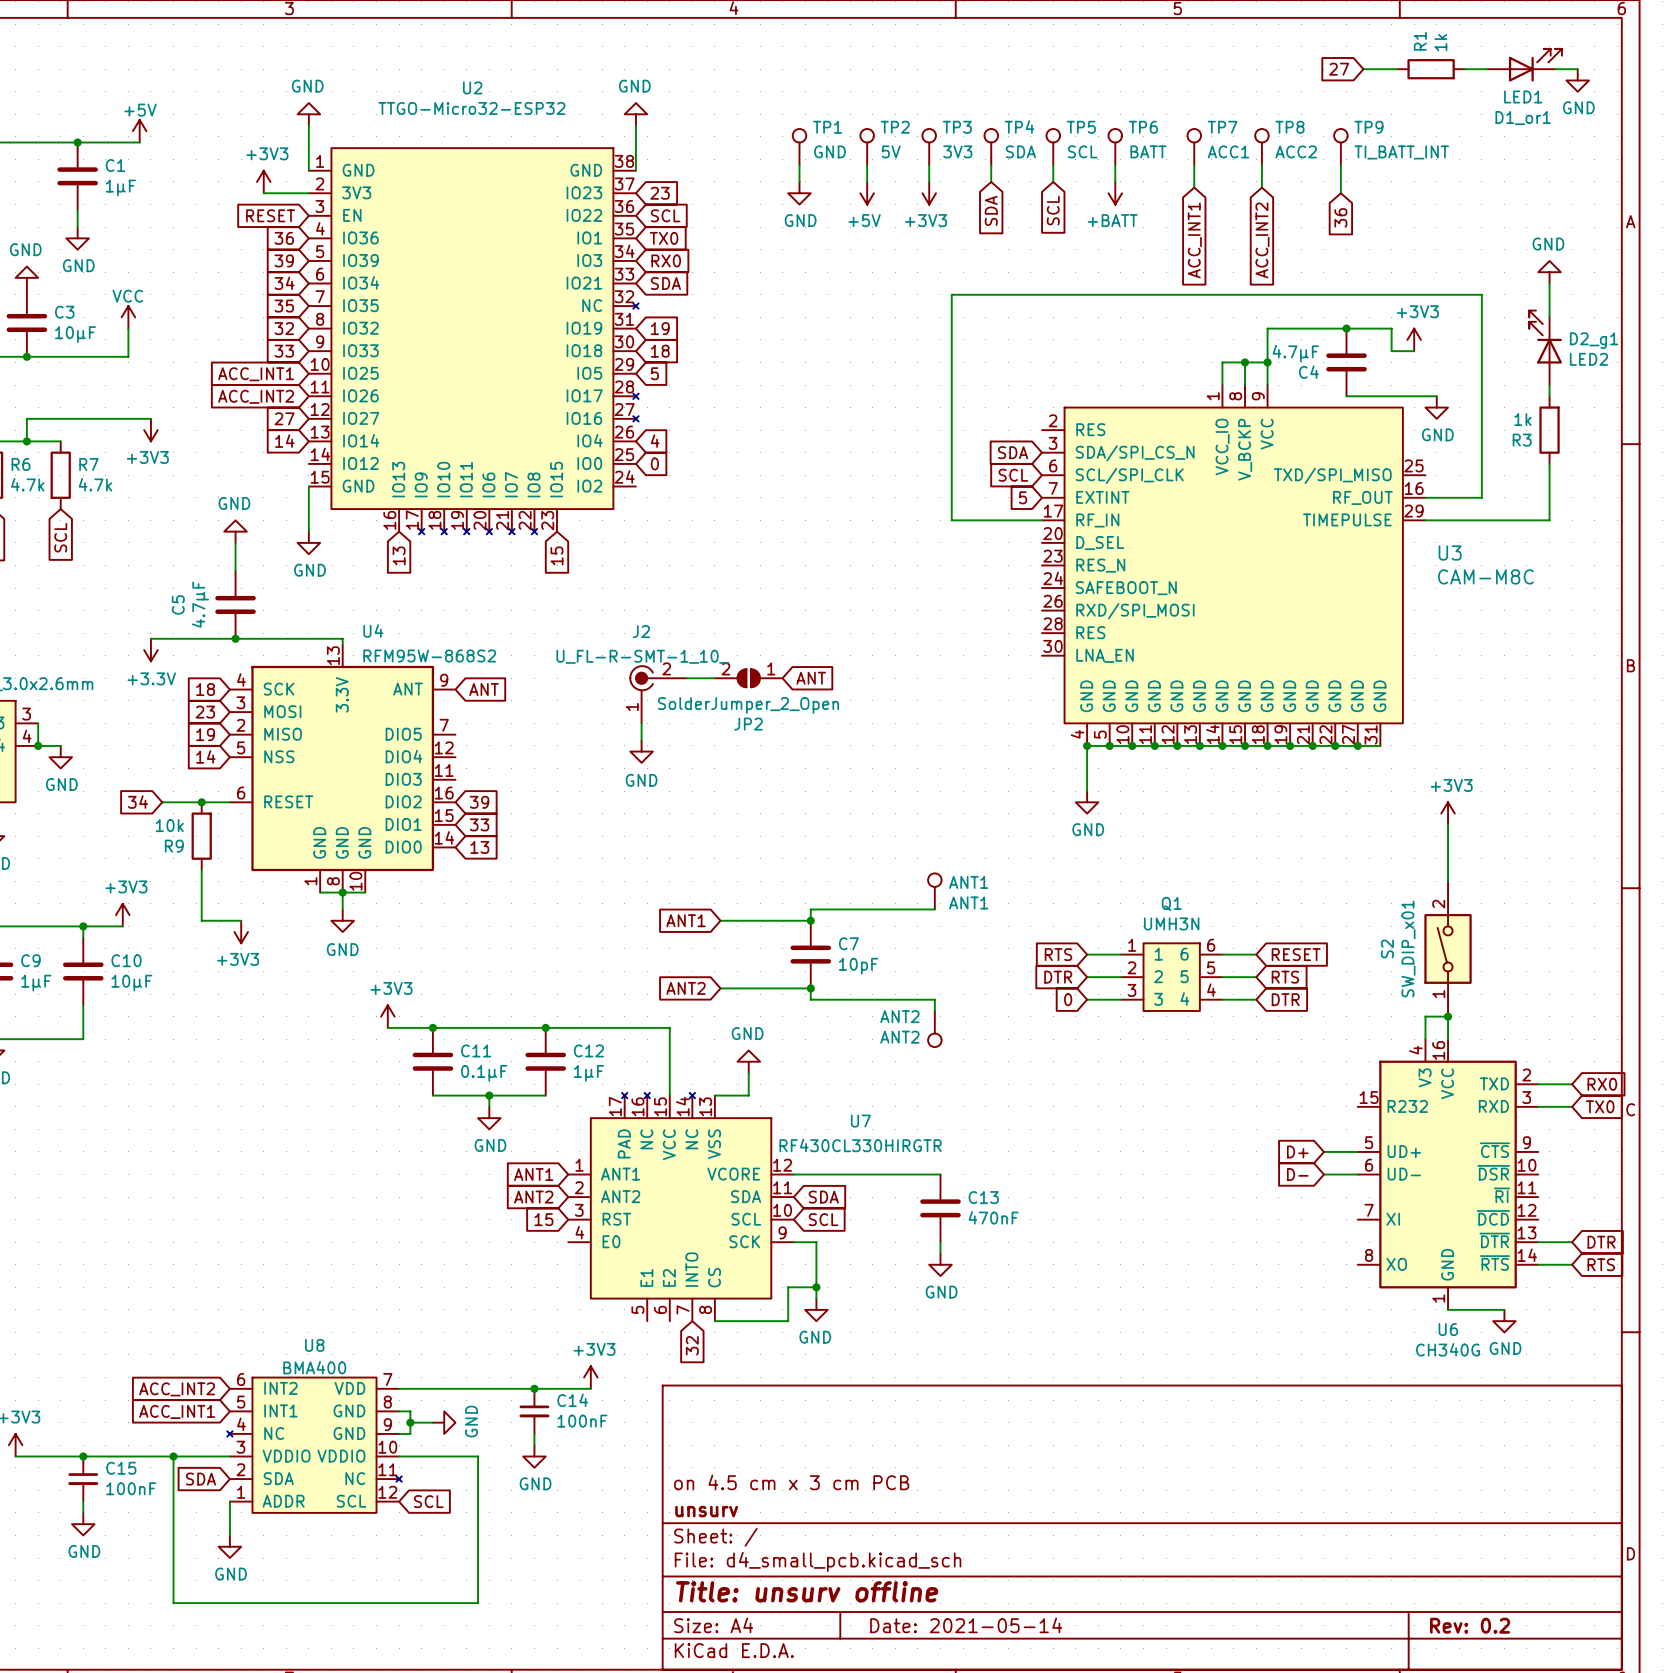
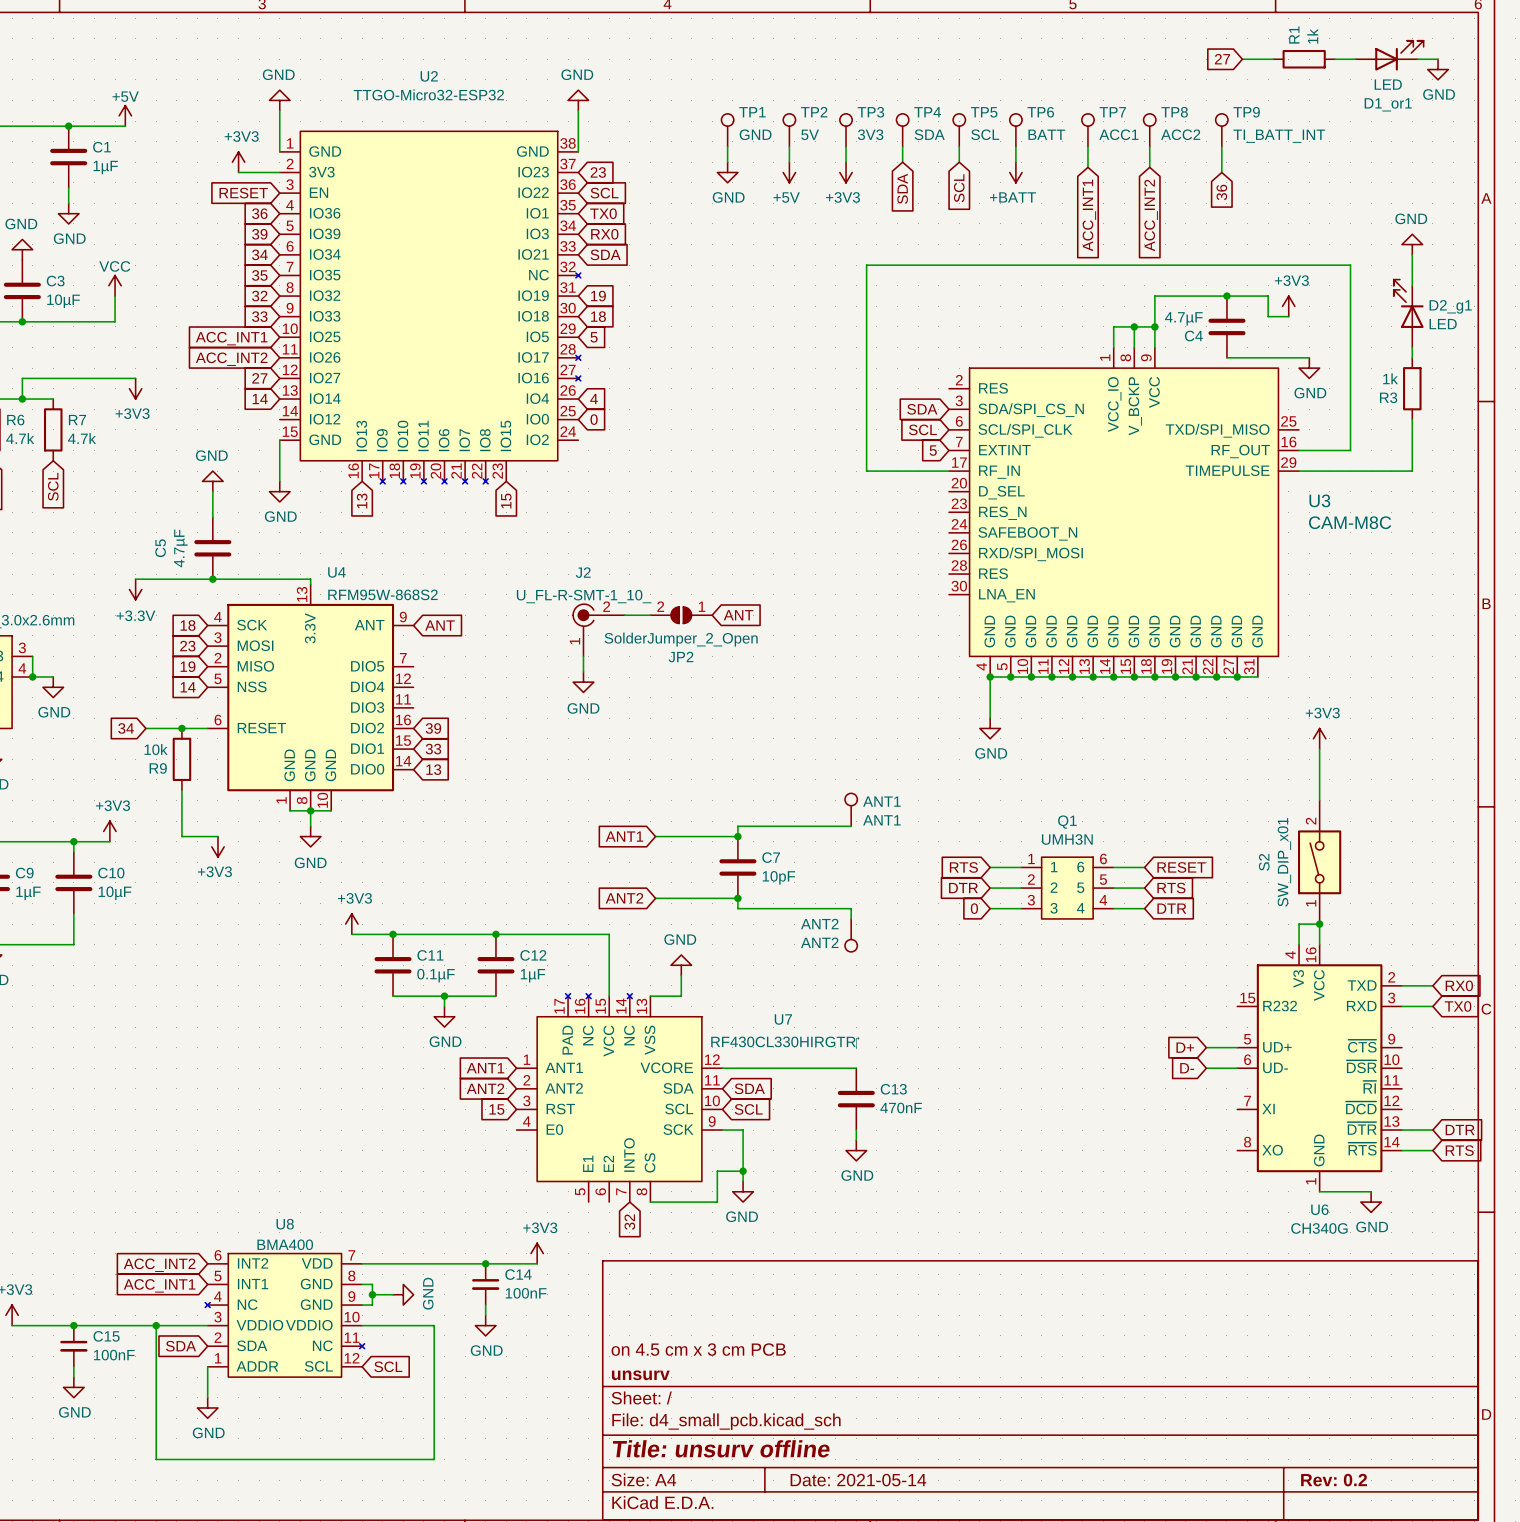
D1_or1 value: LED1 (1523, 96) -> LED (1388, 84)
D2_g1 value: LED2 (1588, 359) -> LED (1443, 324)

